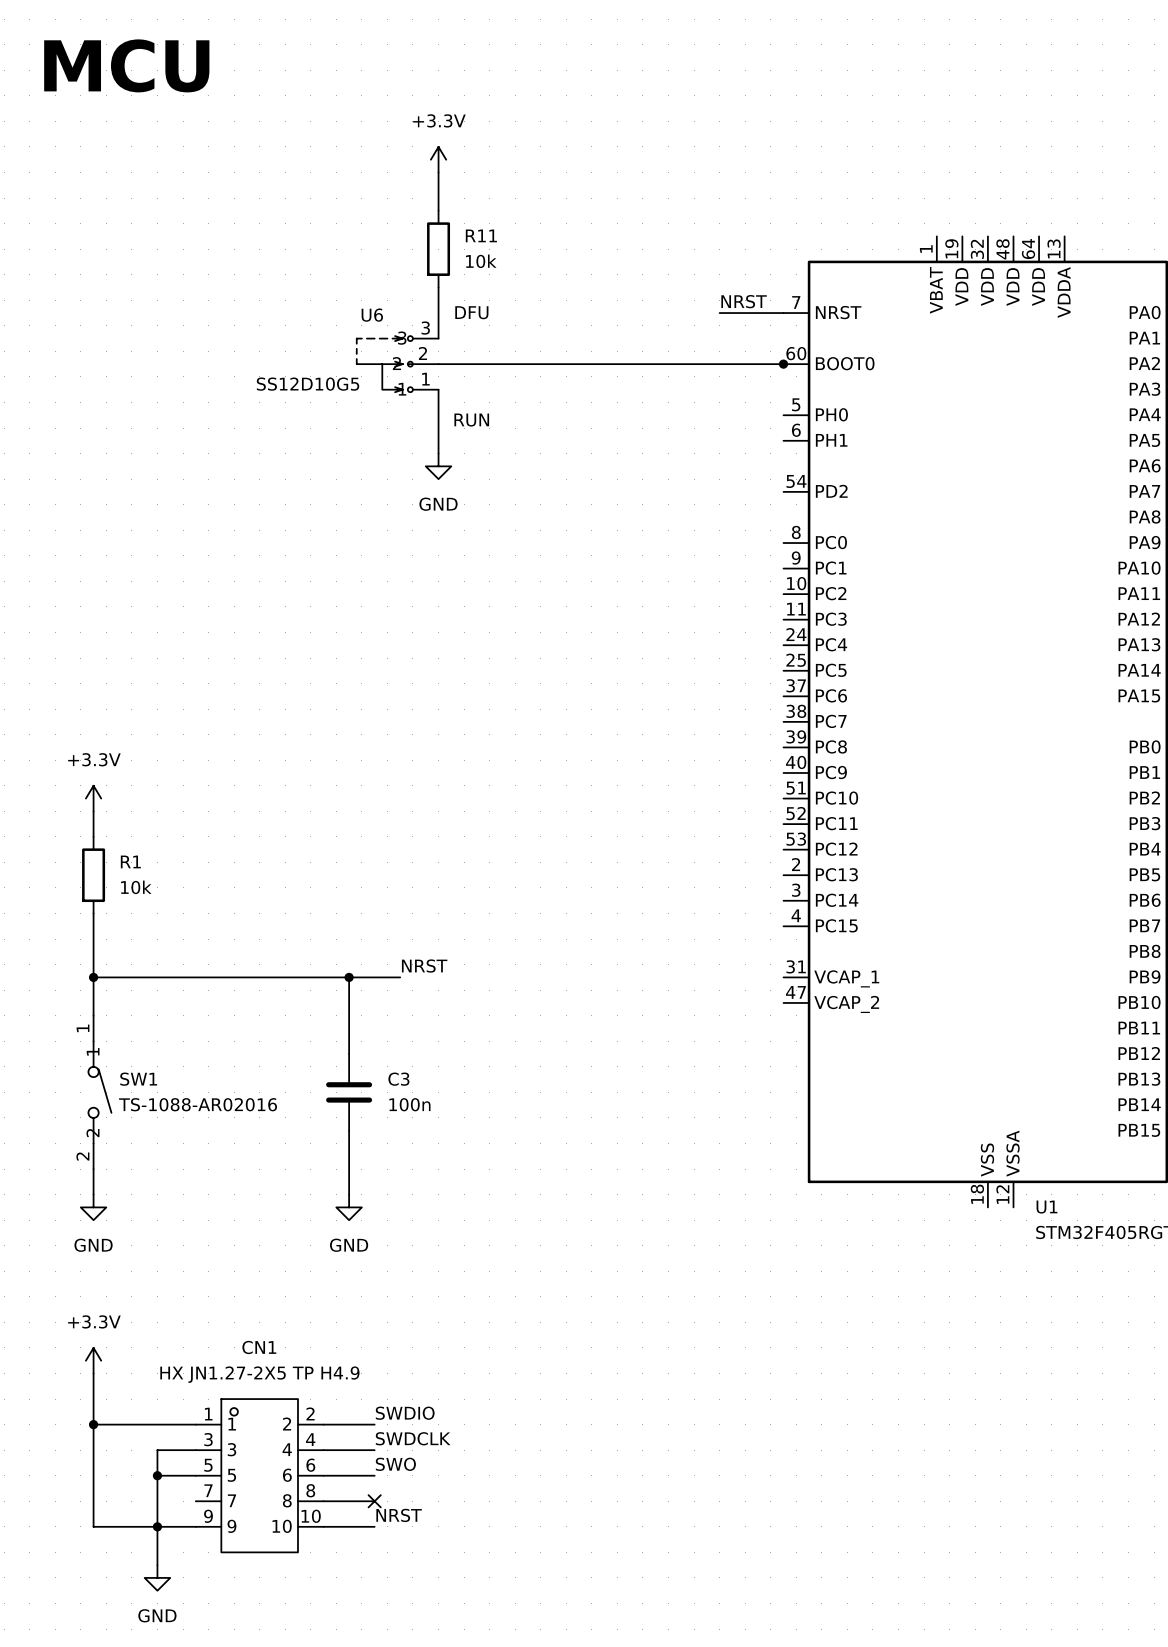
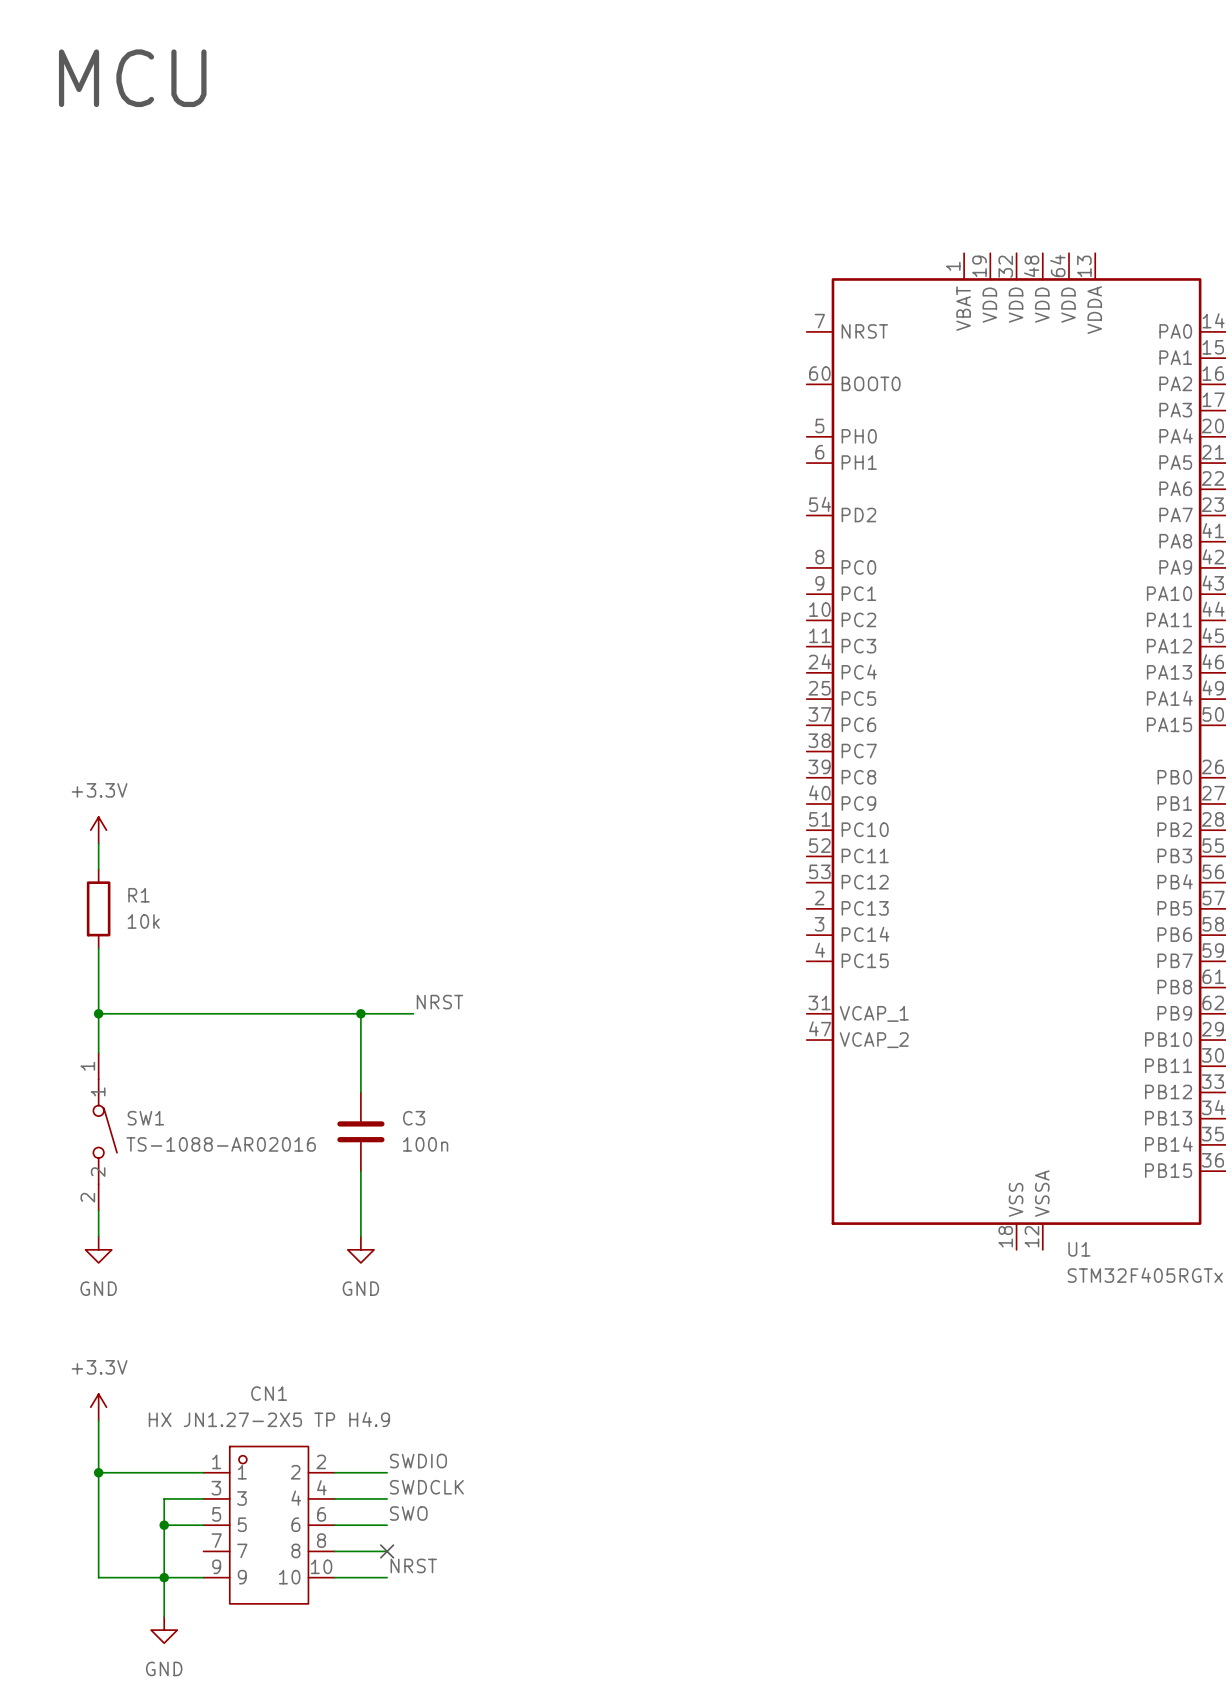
power symbol: +3.3V (438, 159) -> none
wire: (438, 172) (438, 210) -> none
R11: 10k (438, 249) -> none
wire: (438, 287) (438, 338) -> none
label: NRST (744, 301) -> none
text: DFU (471, 312) -> none
wire: (719, 313) (783, 313) -> none
U6: SS12D10G5 (397, 364) -> none
wire: (438, 364) (786, 364) -> none
junction: (783, 364) -> none
wire: (438, 389) (438, 453) -> none
text: RUN (471, 420) -> none
power symbol: GND (438, 466) -> none

